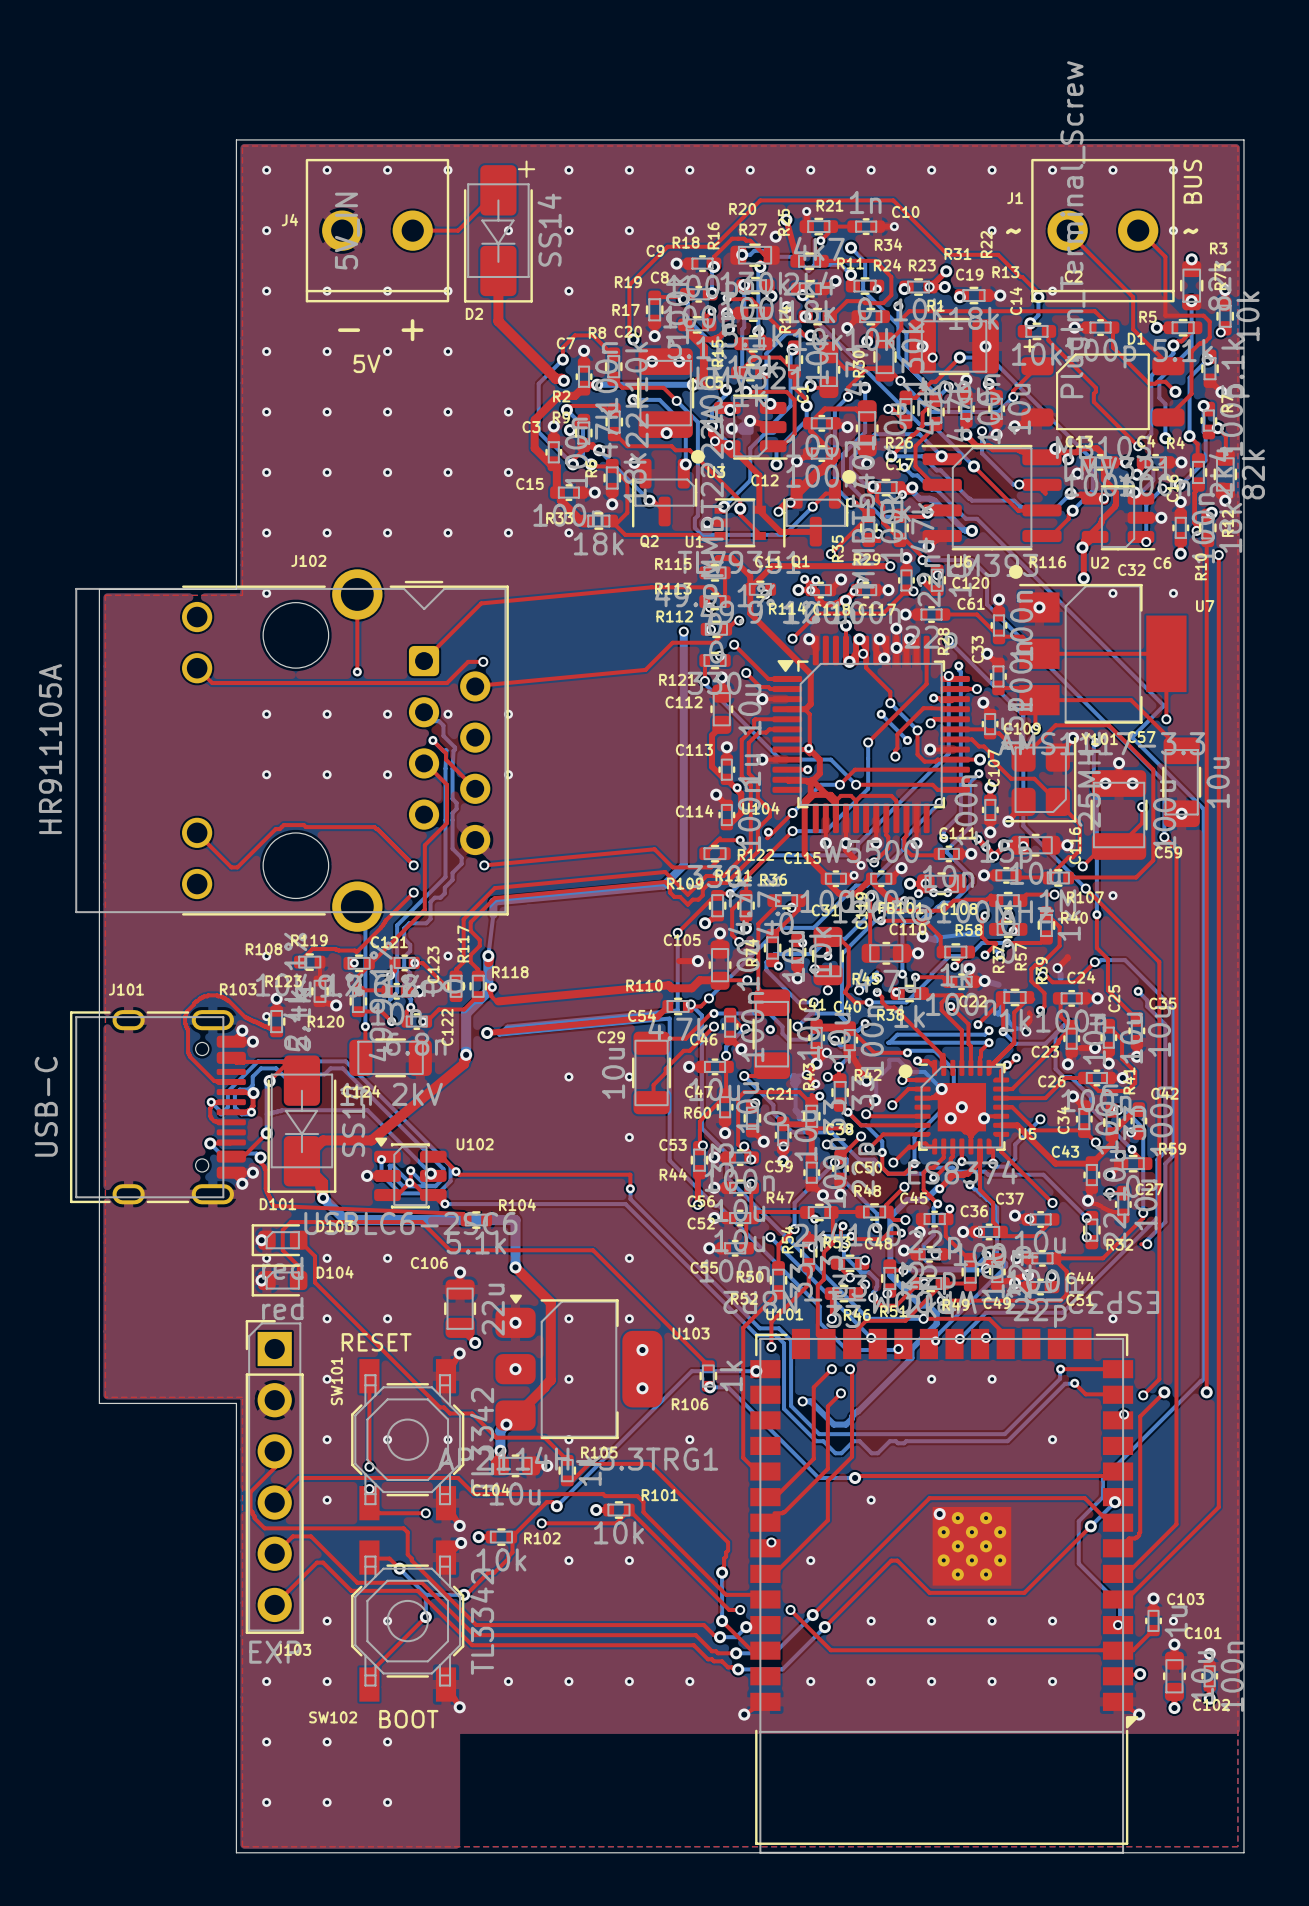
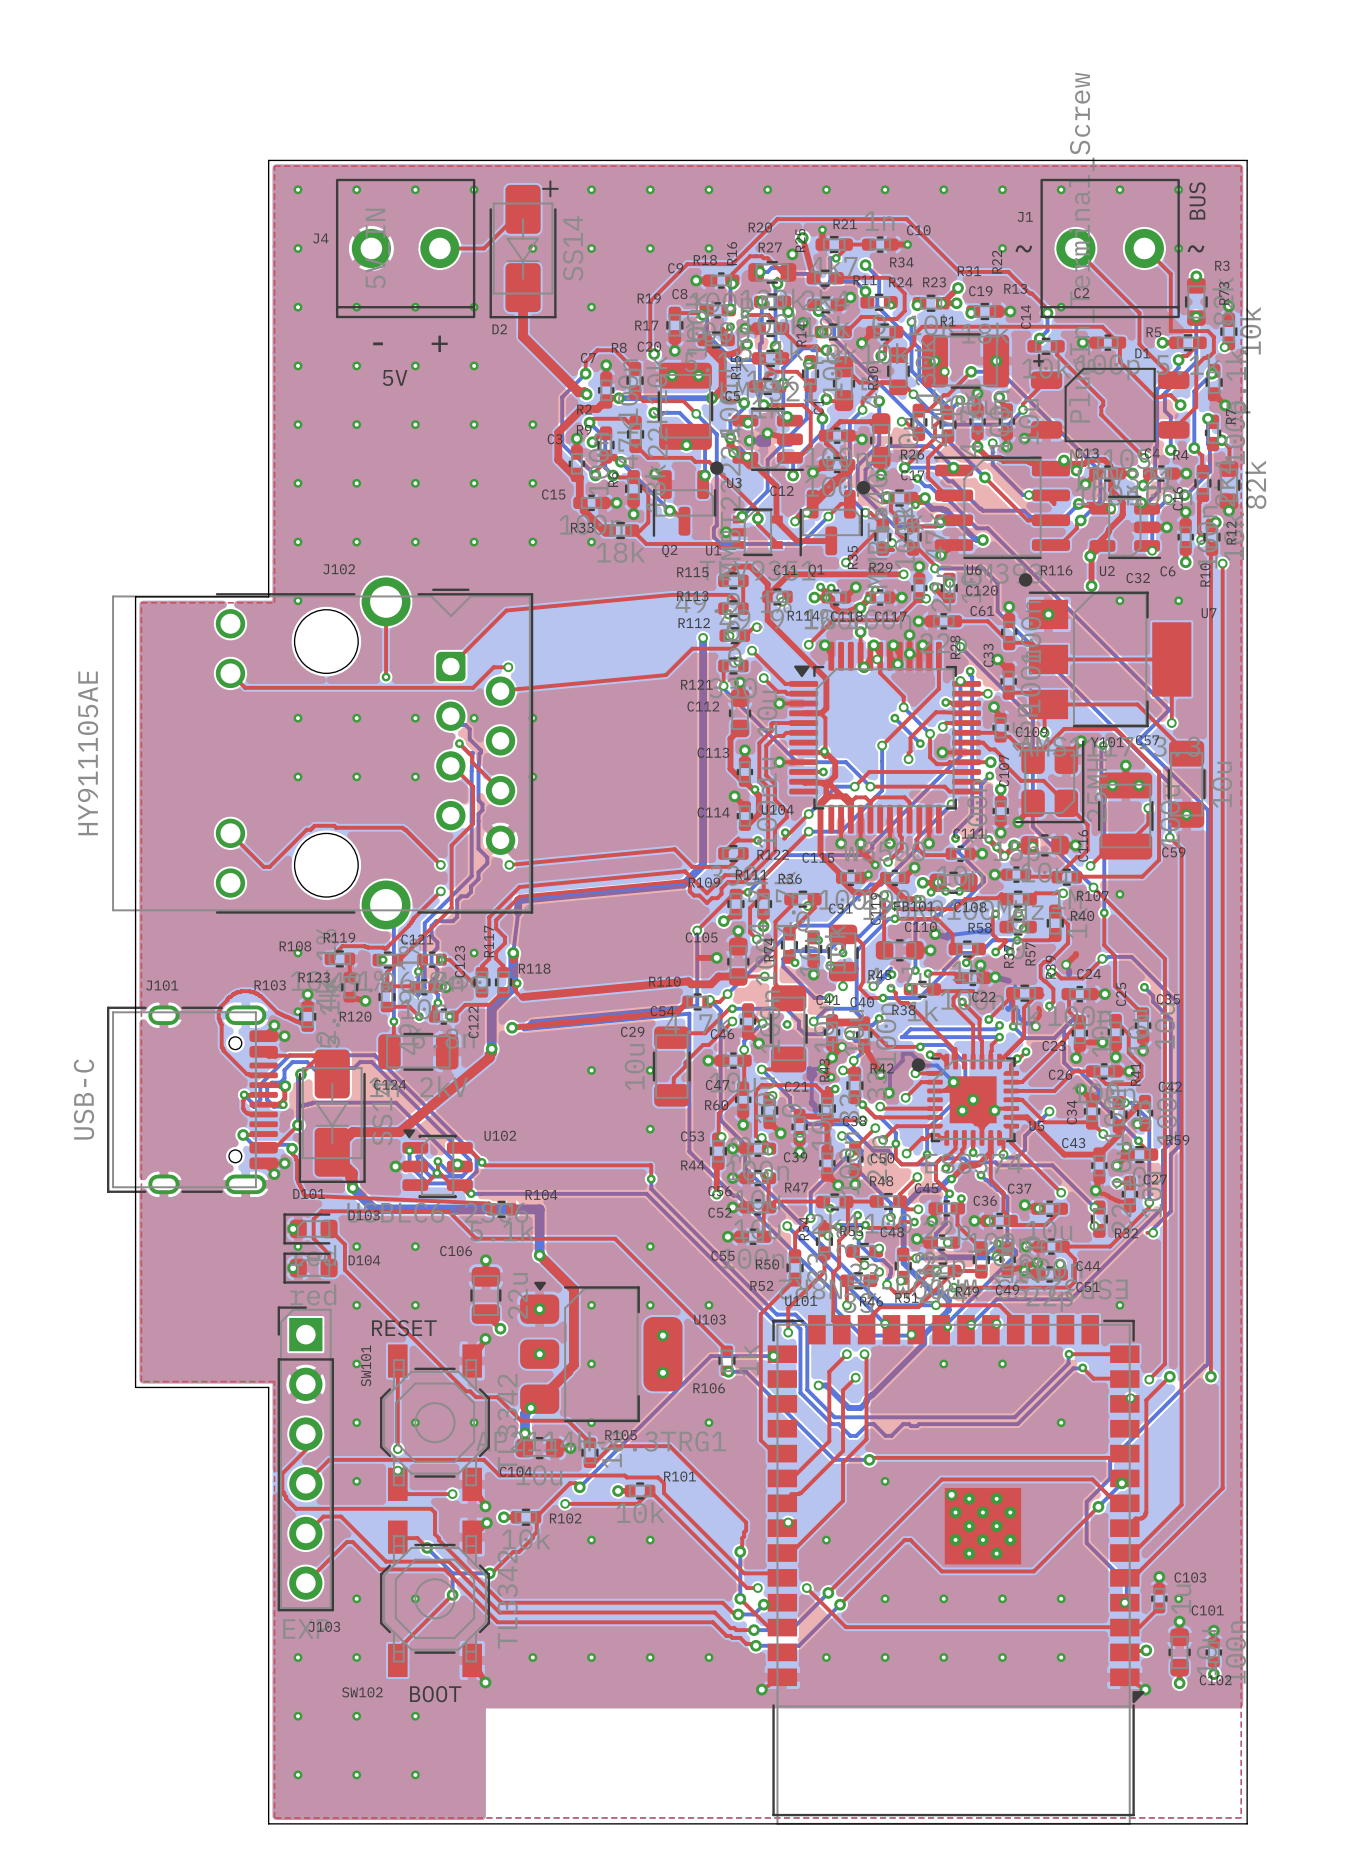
J102 value: HR911105A (50, 749) -> HY911105AE (88, 753)

